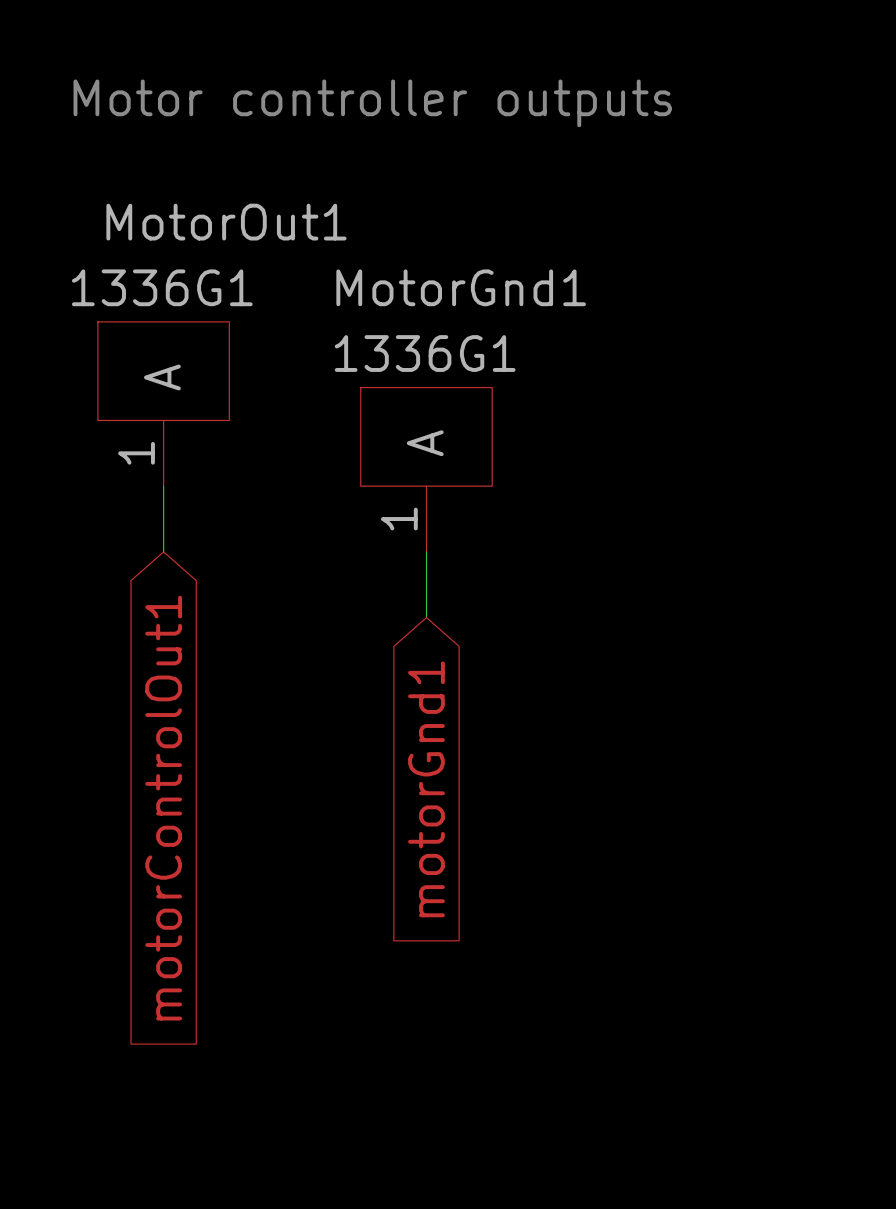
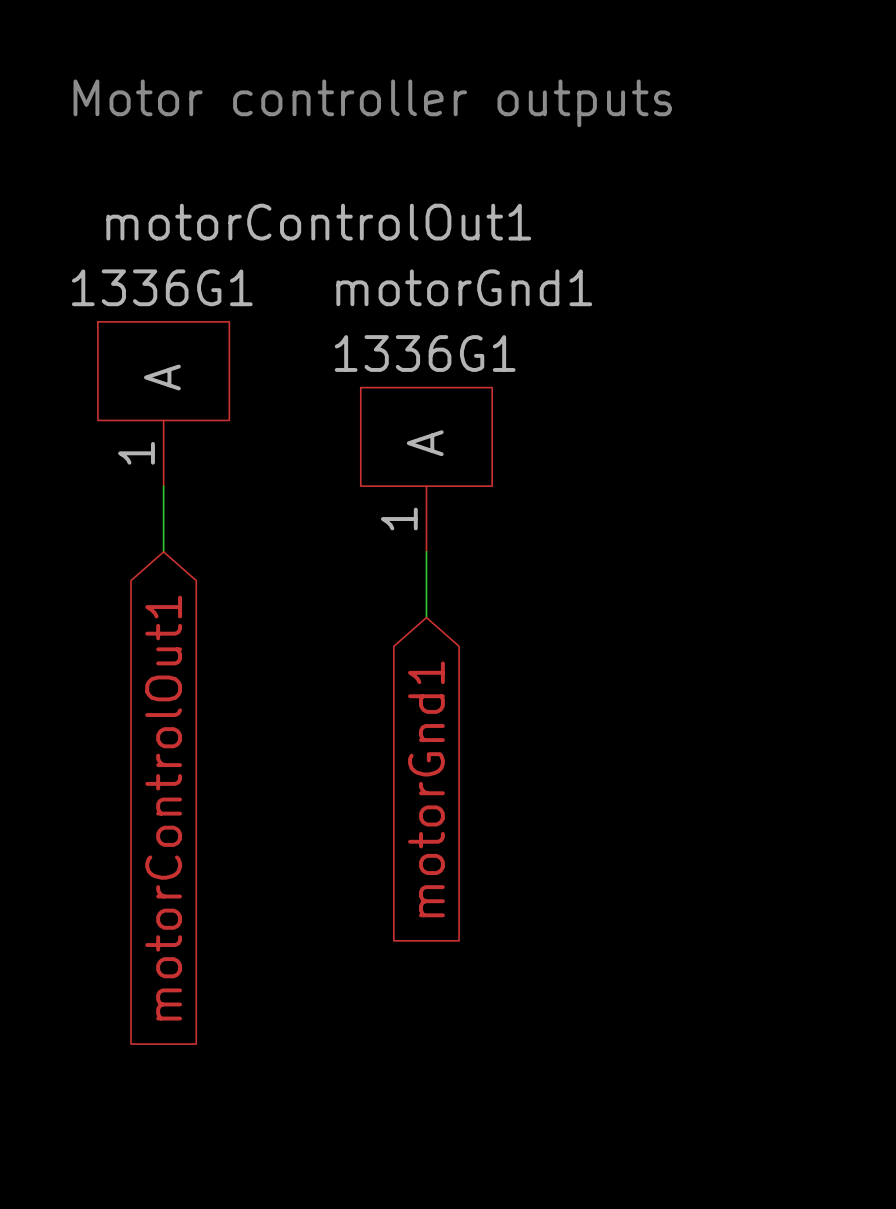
MotorOut1 name: MotorOut1 (226, 222) -> motorControlOut1 (318, 222)
MotorGnd1 name: MotorGnd1 (461, 287) -> motorGnd1 (464, 287)

